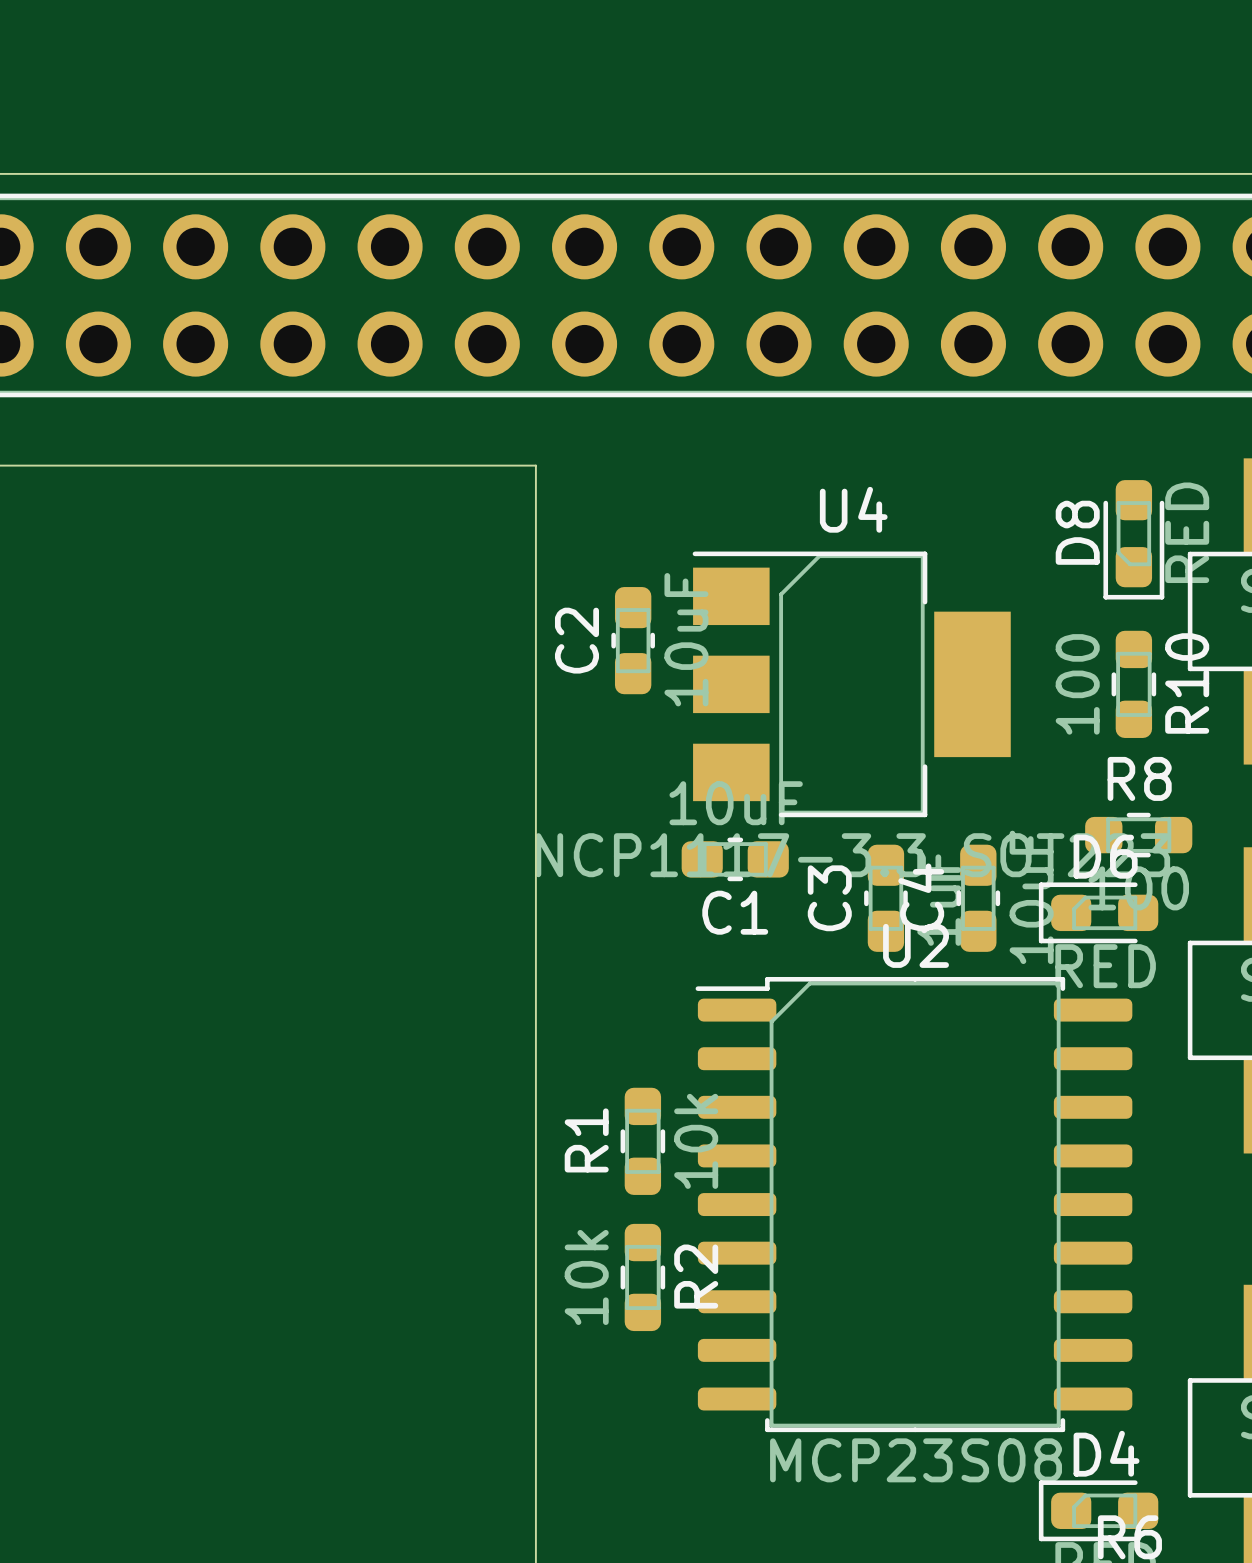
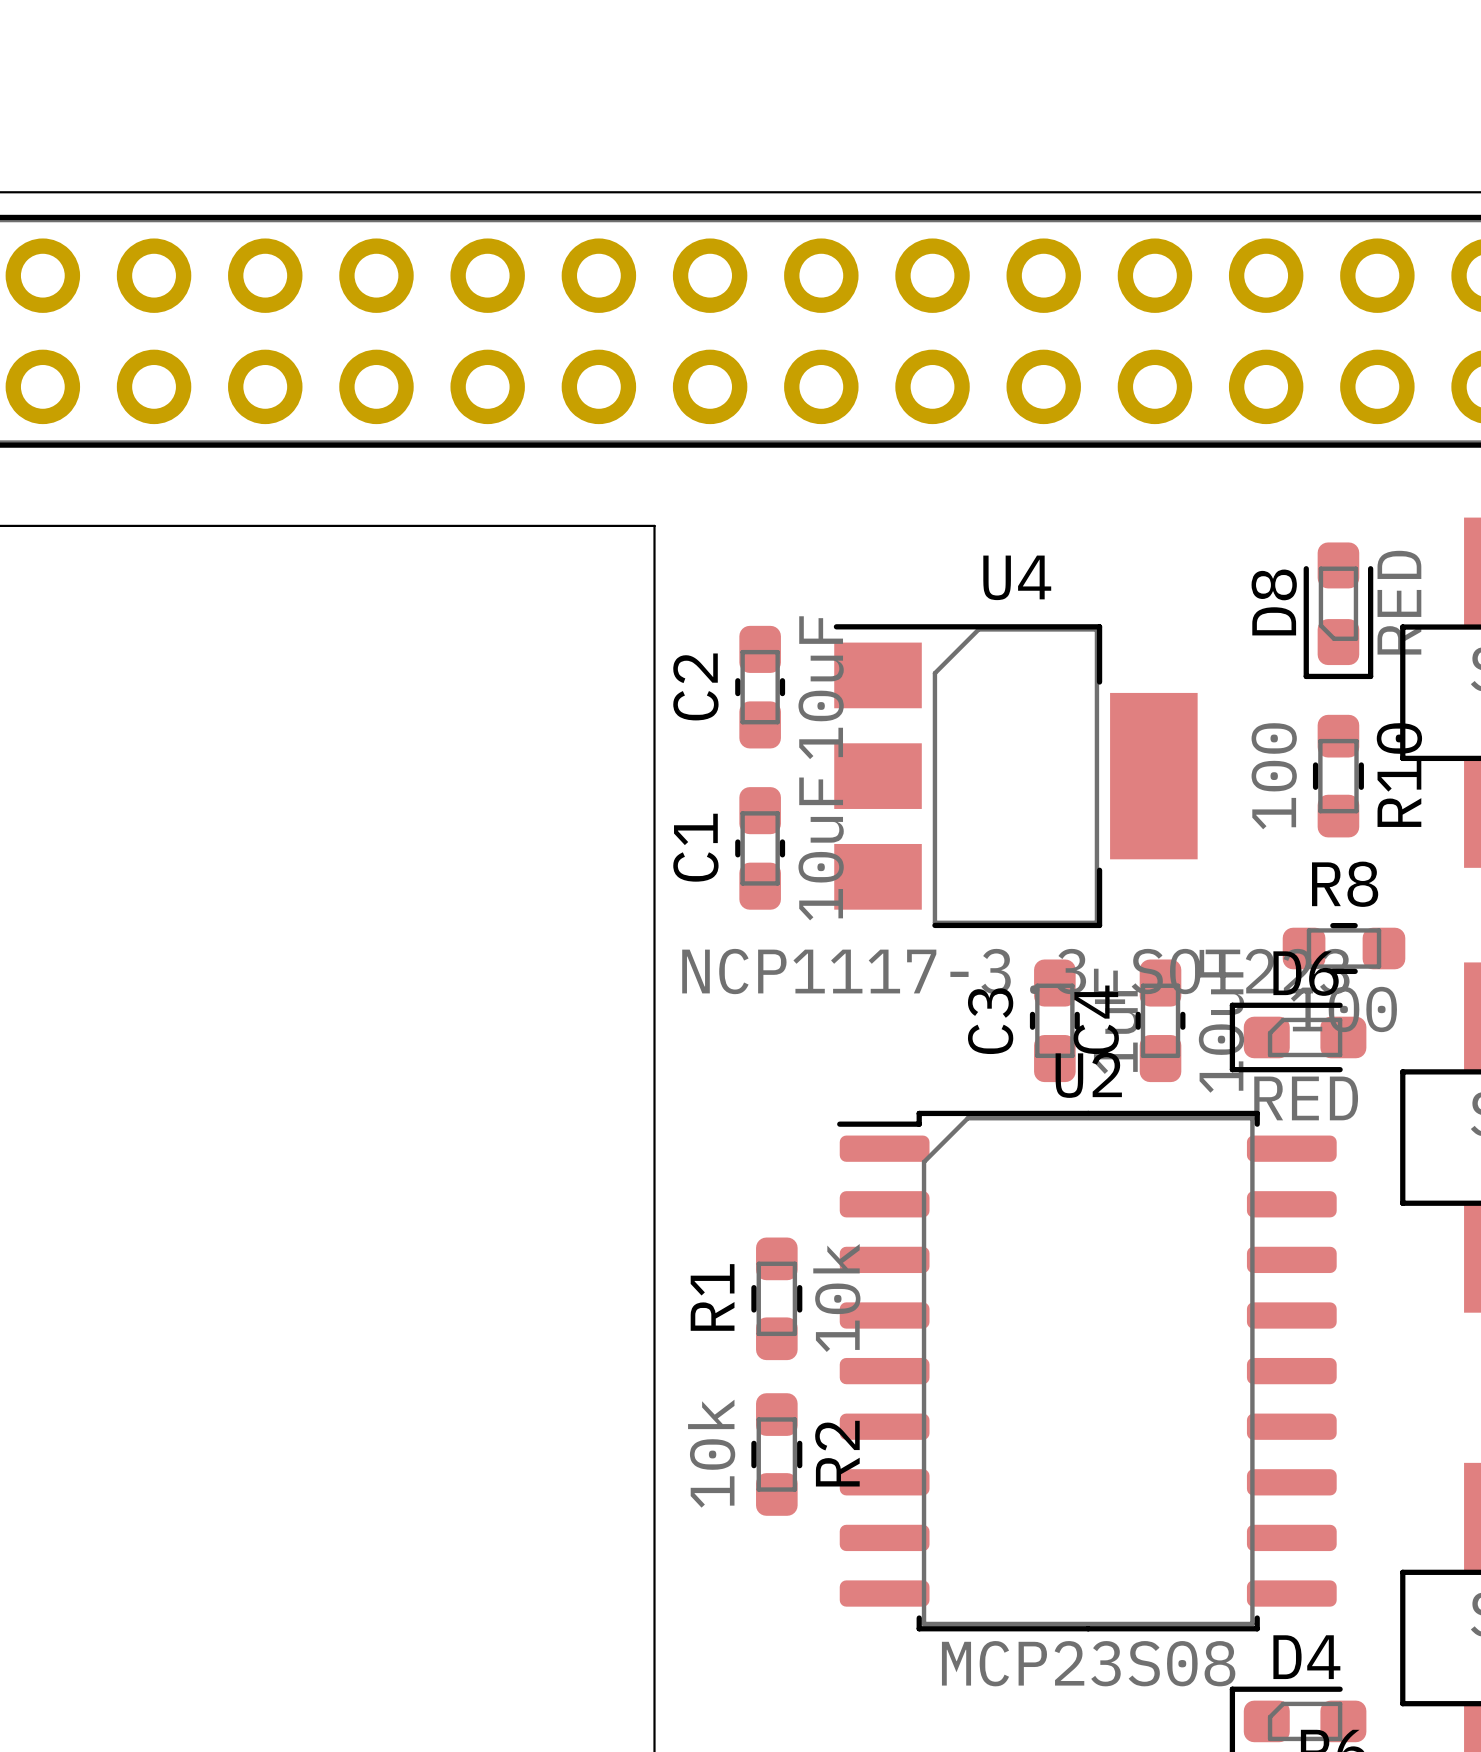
C2 position: (633, 640) -> (760, 687)
C1 rotation: 0° (735, 859) -> 90° clockwise (760, 848)
C1 position: (735, 859) -> (760, 848)

